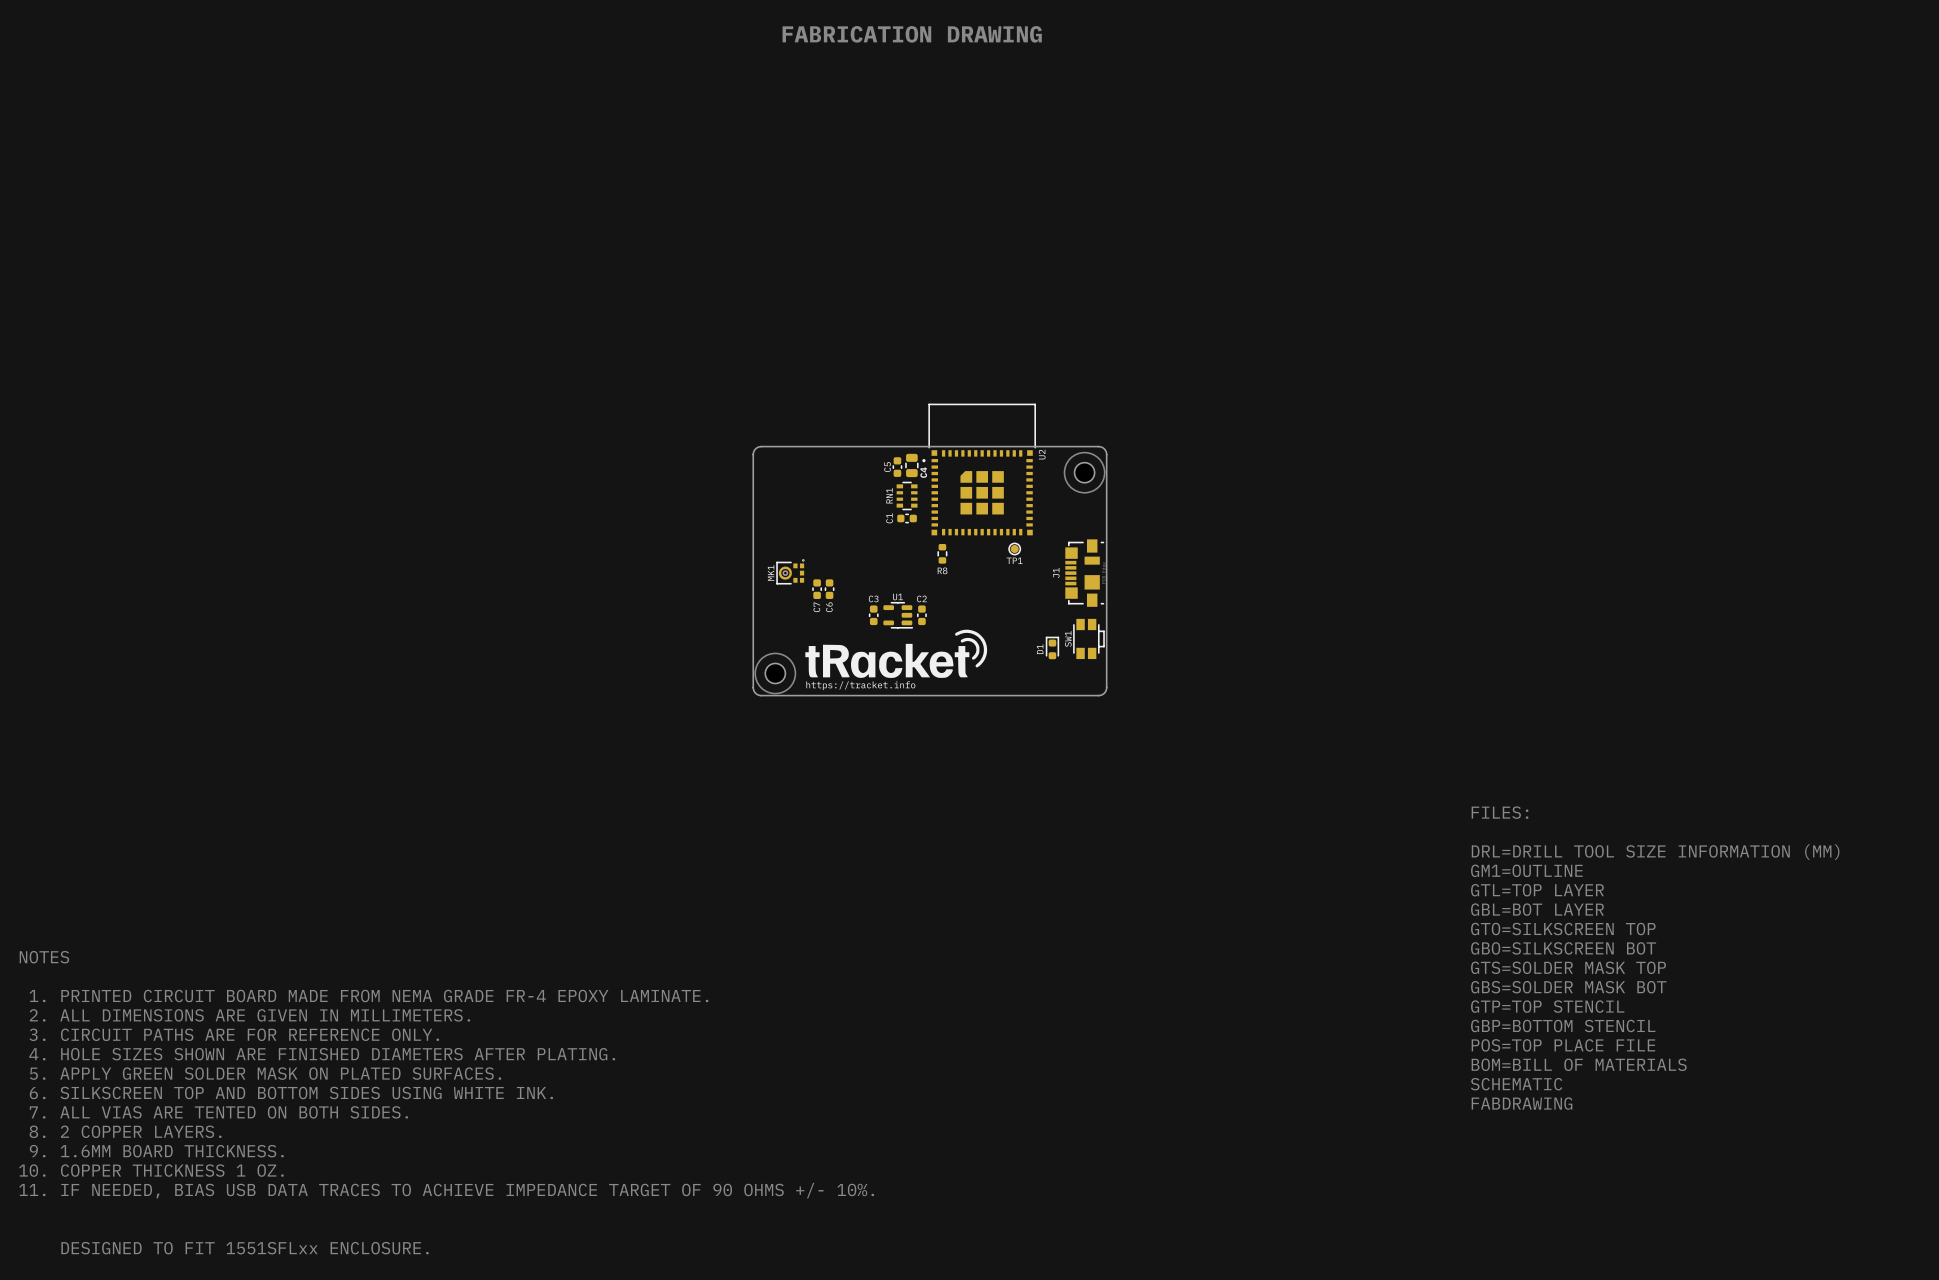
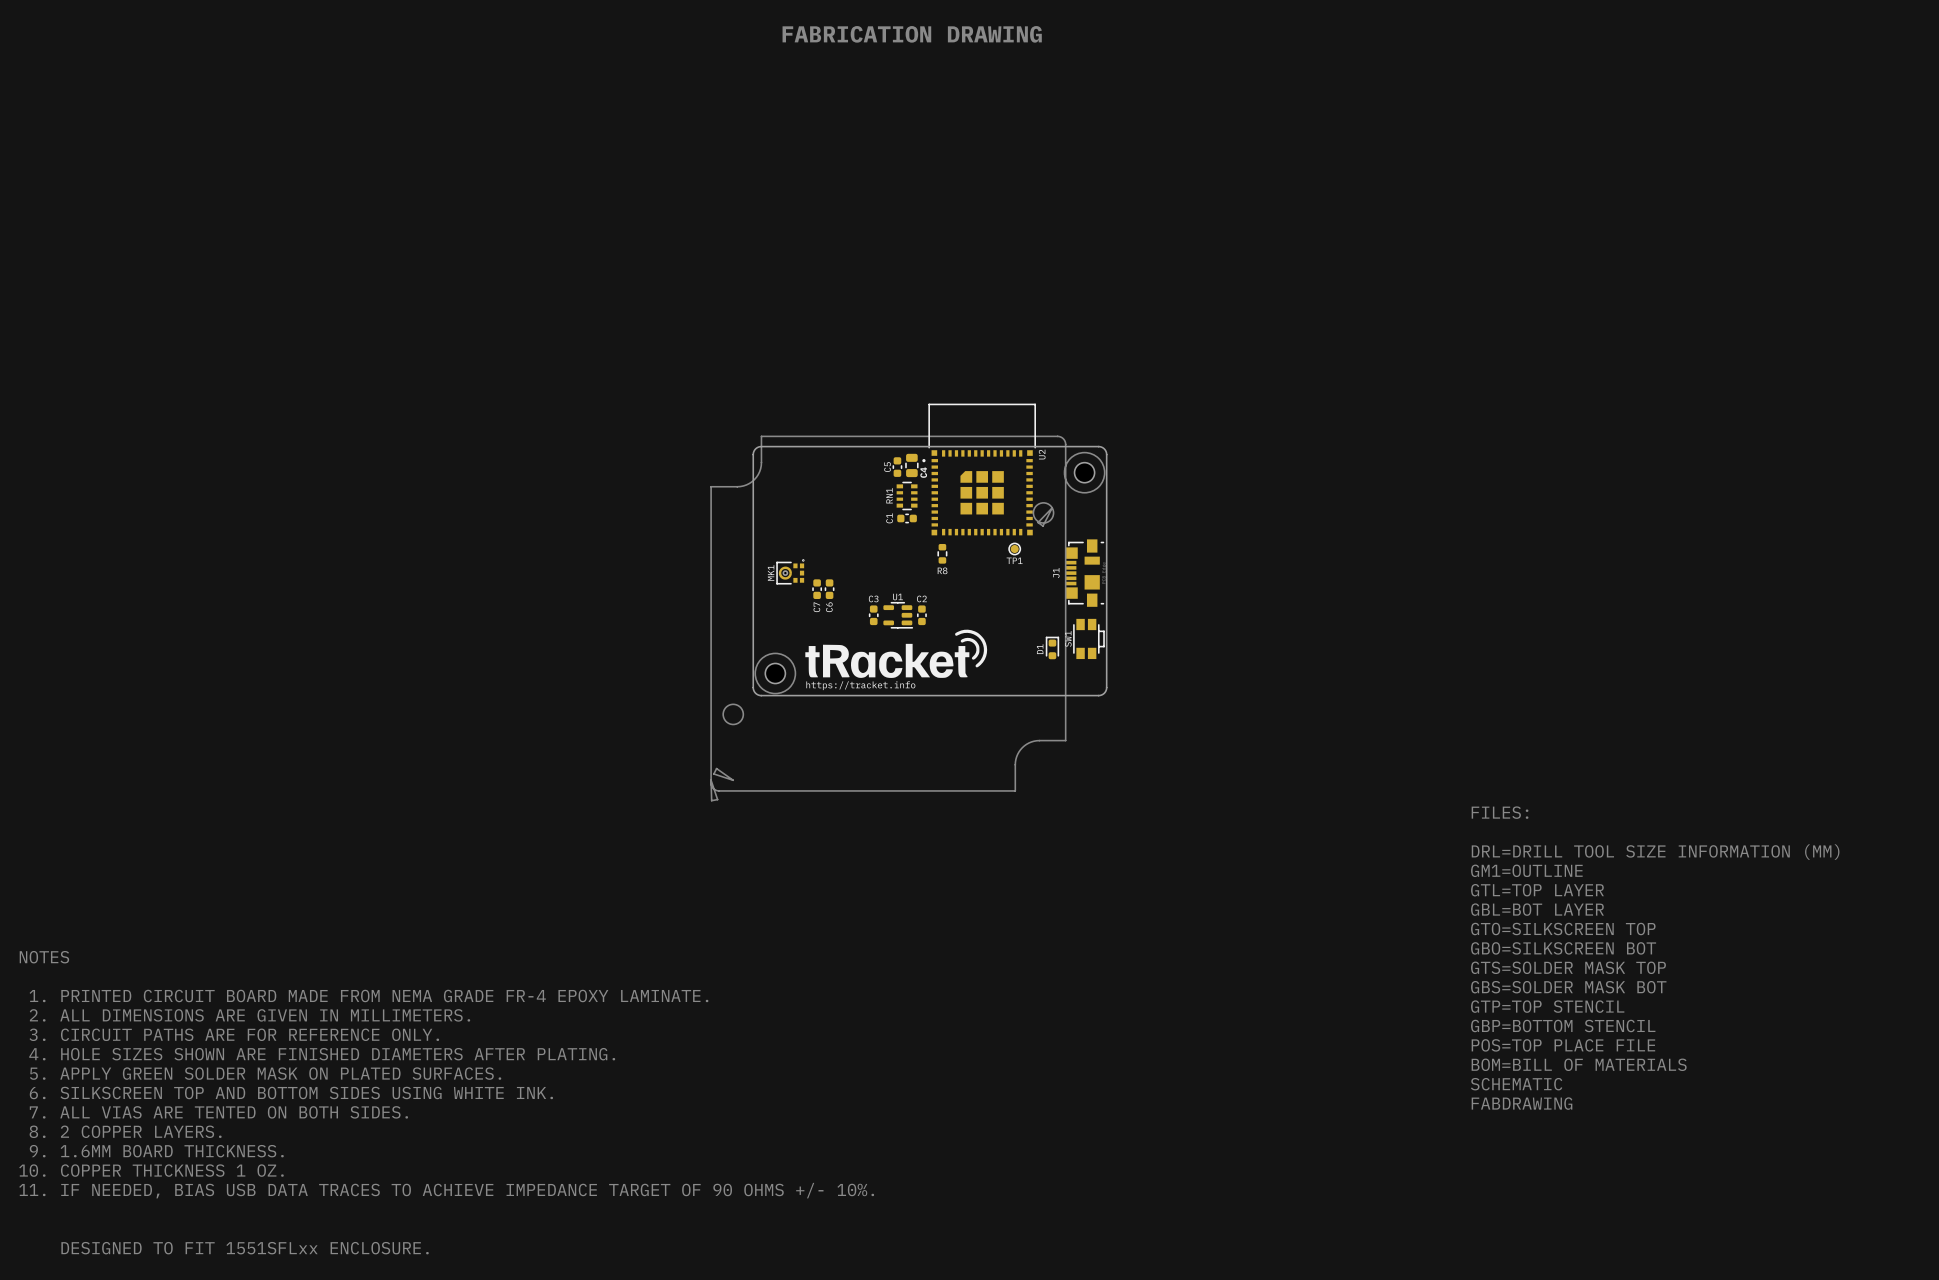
line: none -> (761, 436) (761, 465) (754, 479) (740, 486) (711, 486) (711, 782) (712, 787) (719, 790) (1015, 790) (1015, 762) (1022, 747) (1036, 740) (1065, 740) (1065, 444) (1063, 439) (1057, 436) (761, 436)
drawing: none -> [1033, 502, 1054, 524]
line: none -> (1052, 507) (1042, 526) (1038, 522) (1052, 507)
drawing: none -> [723, 704, 744, 725]
line: none -> (716, 768) (733, 780) (713, 773) (716, 768)
line: none -> (711, 780) (711, 800) (717, 799) (711, 780)

